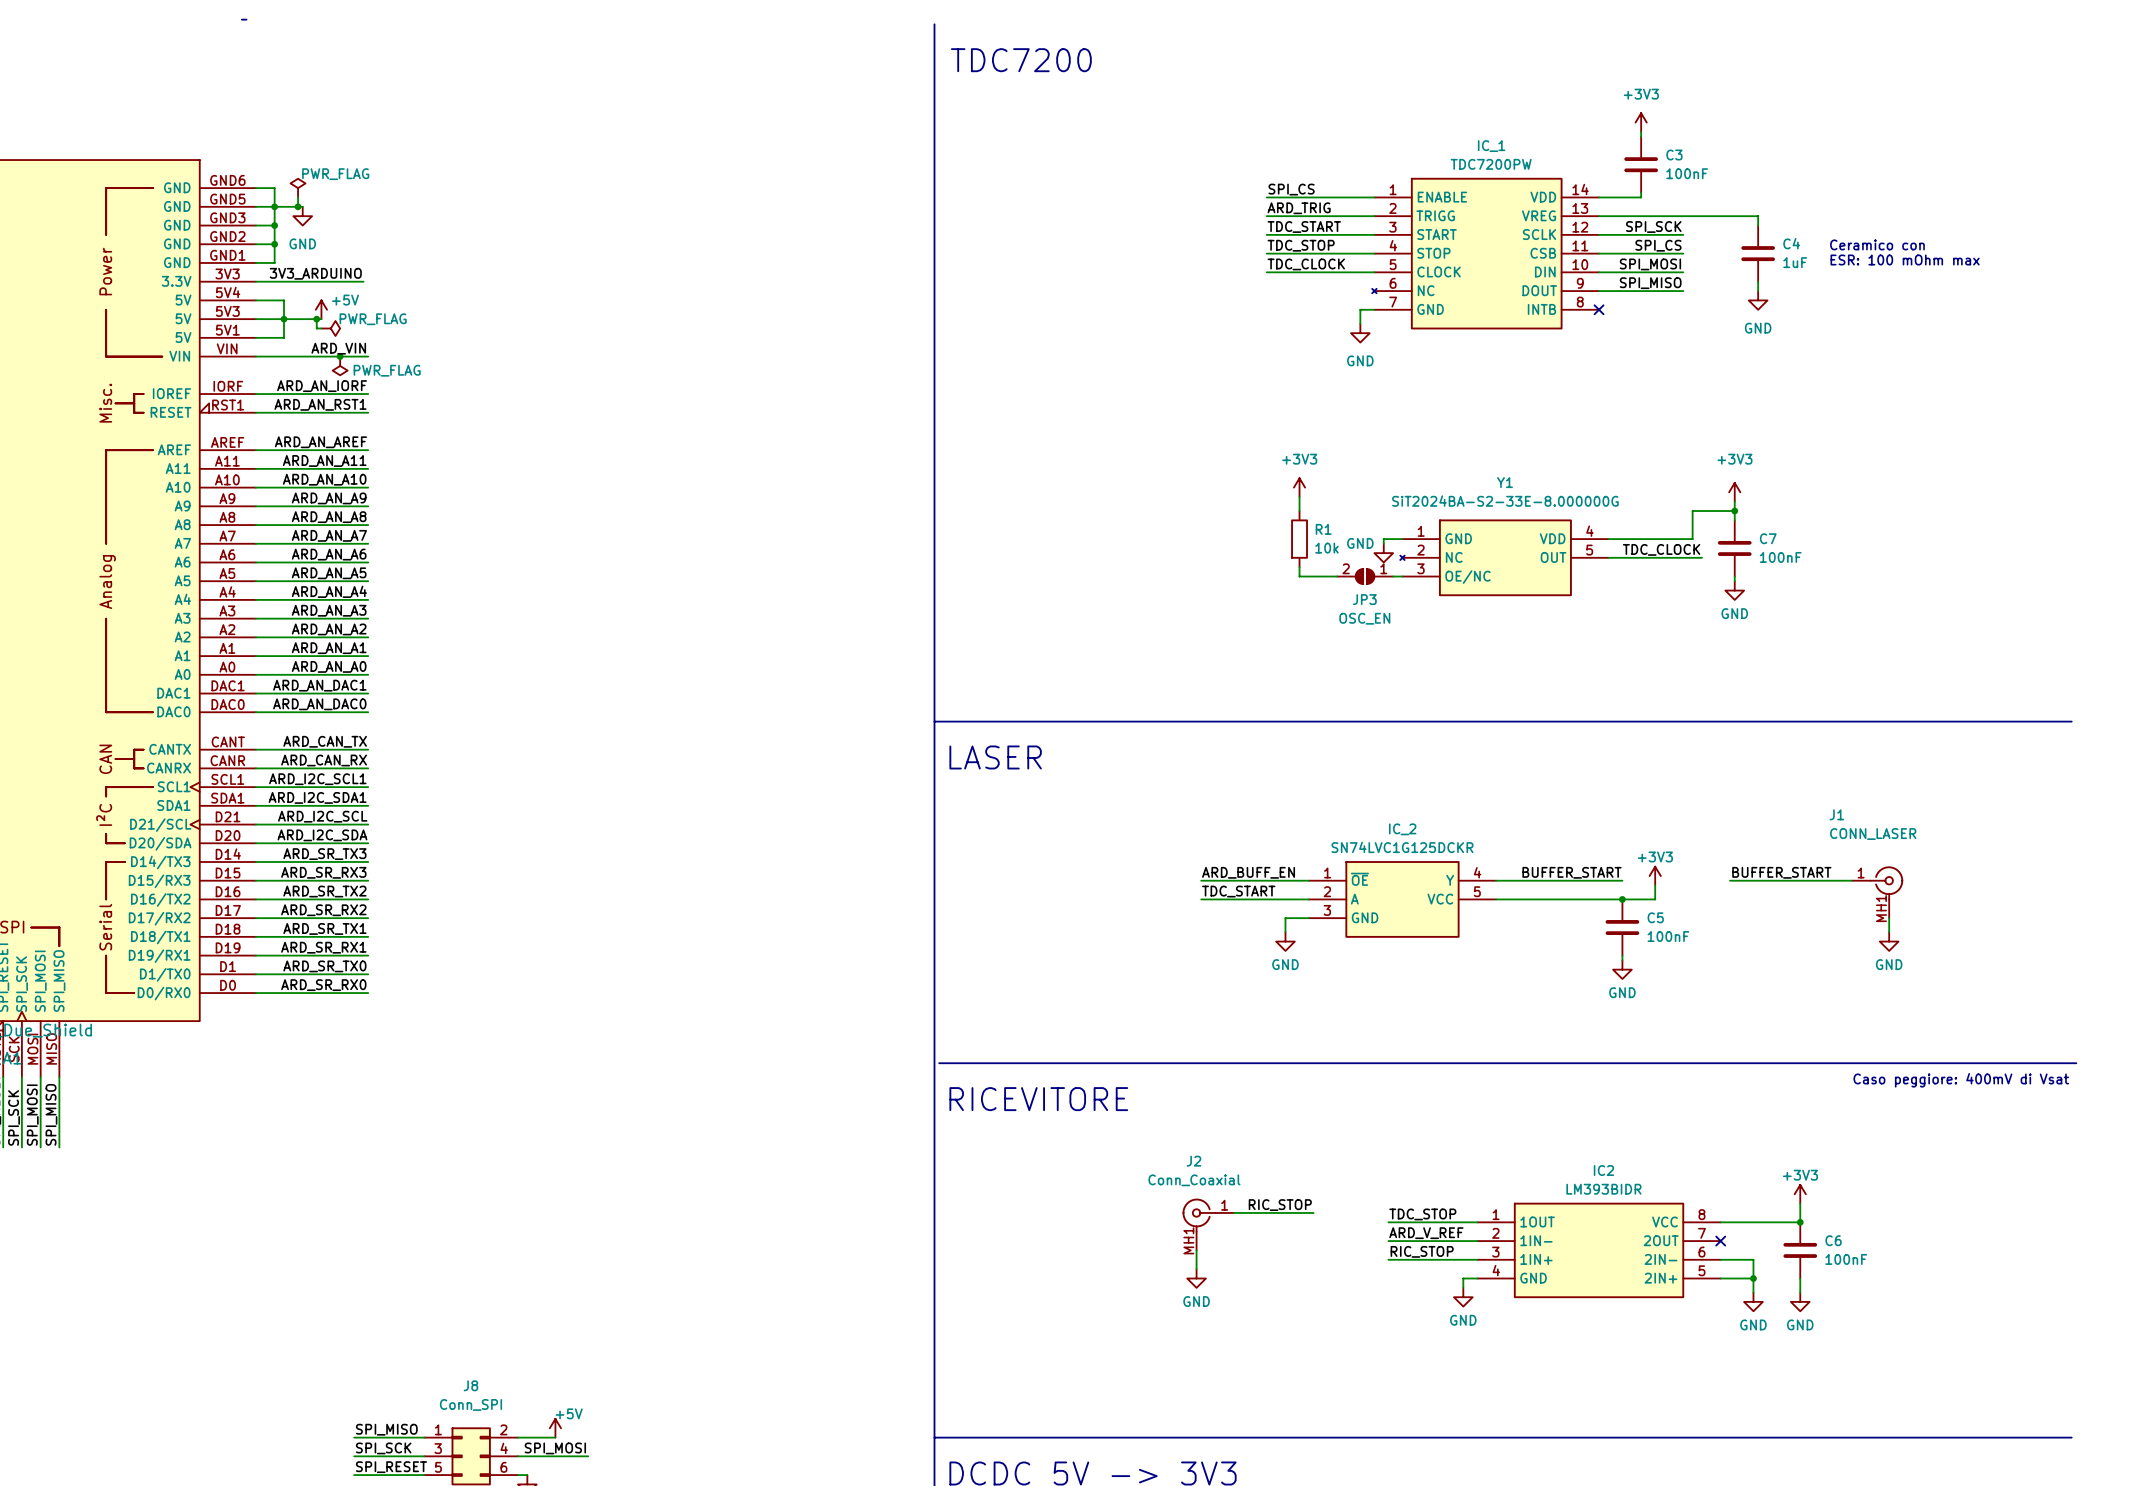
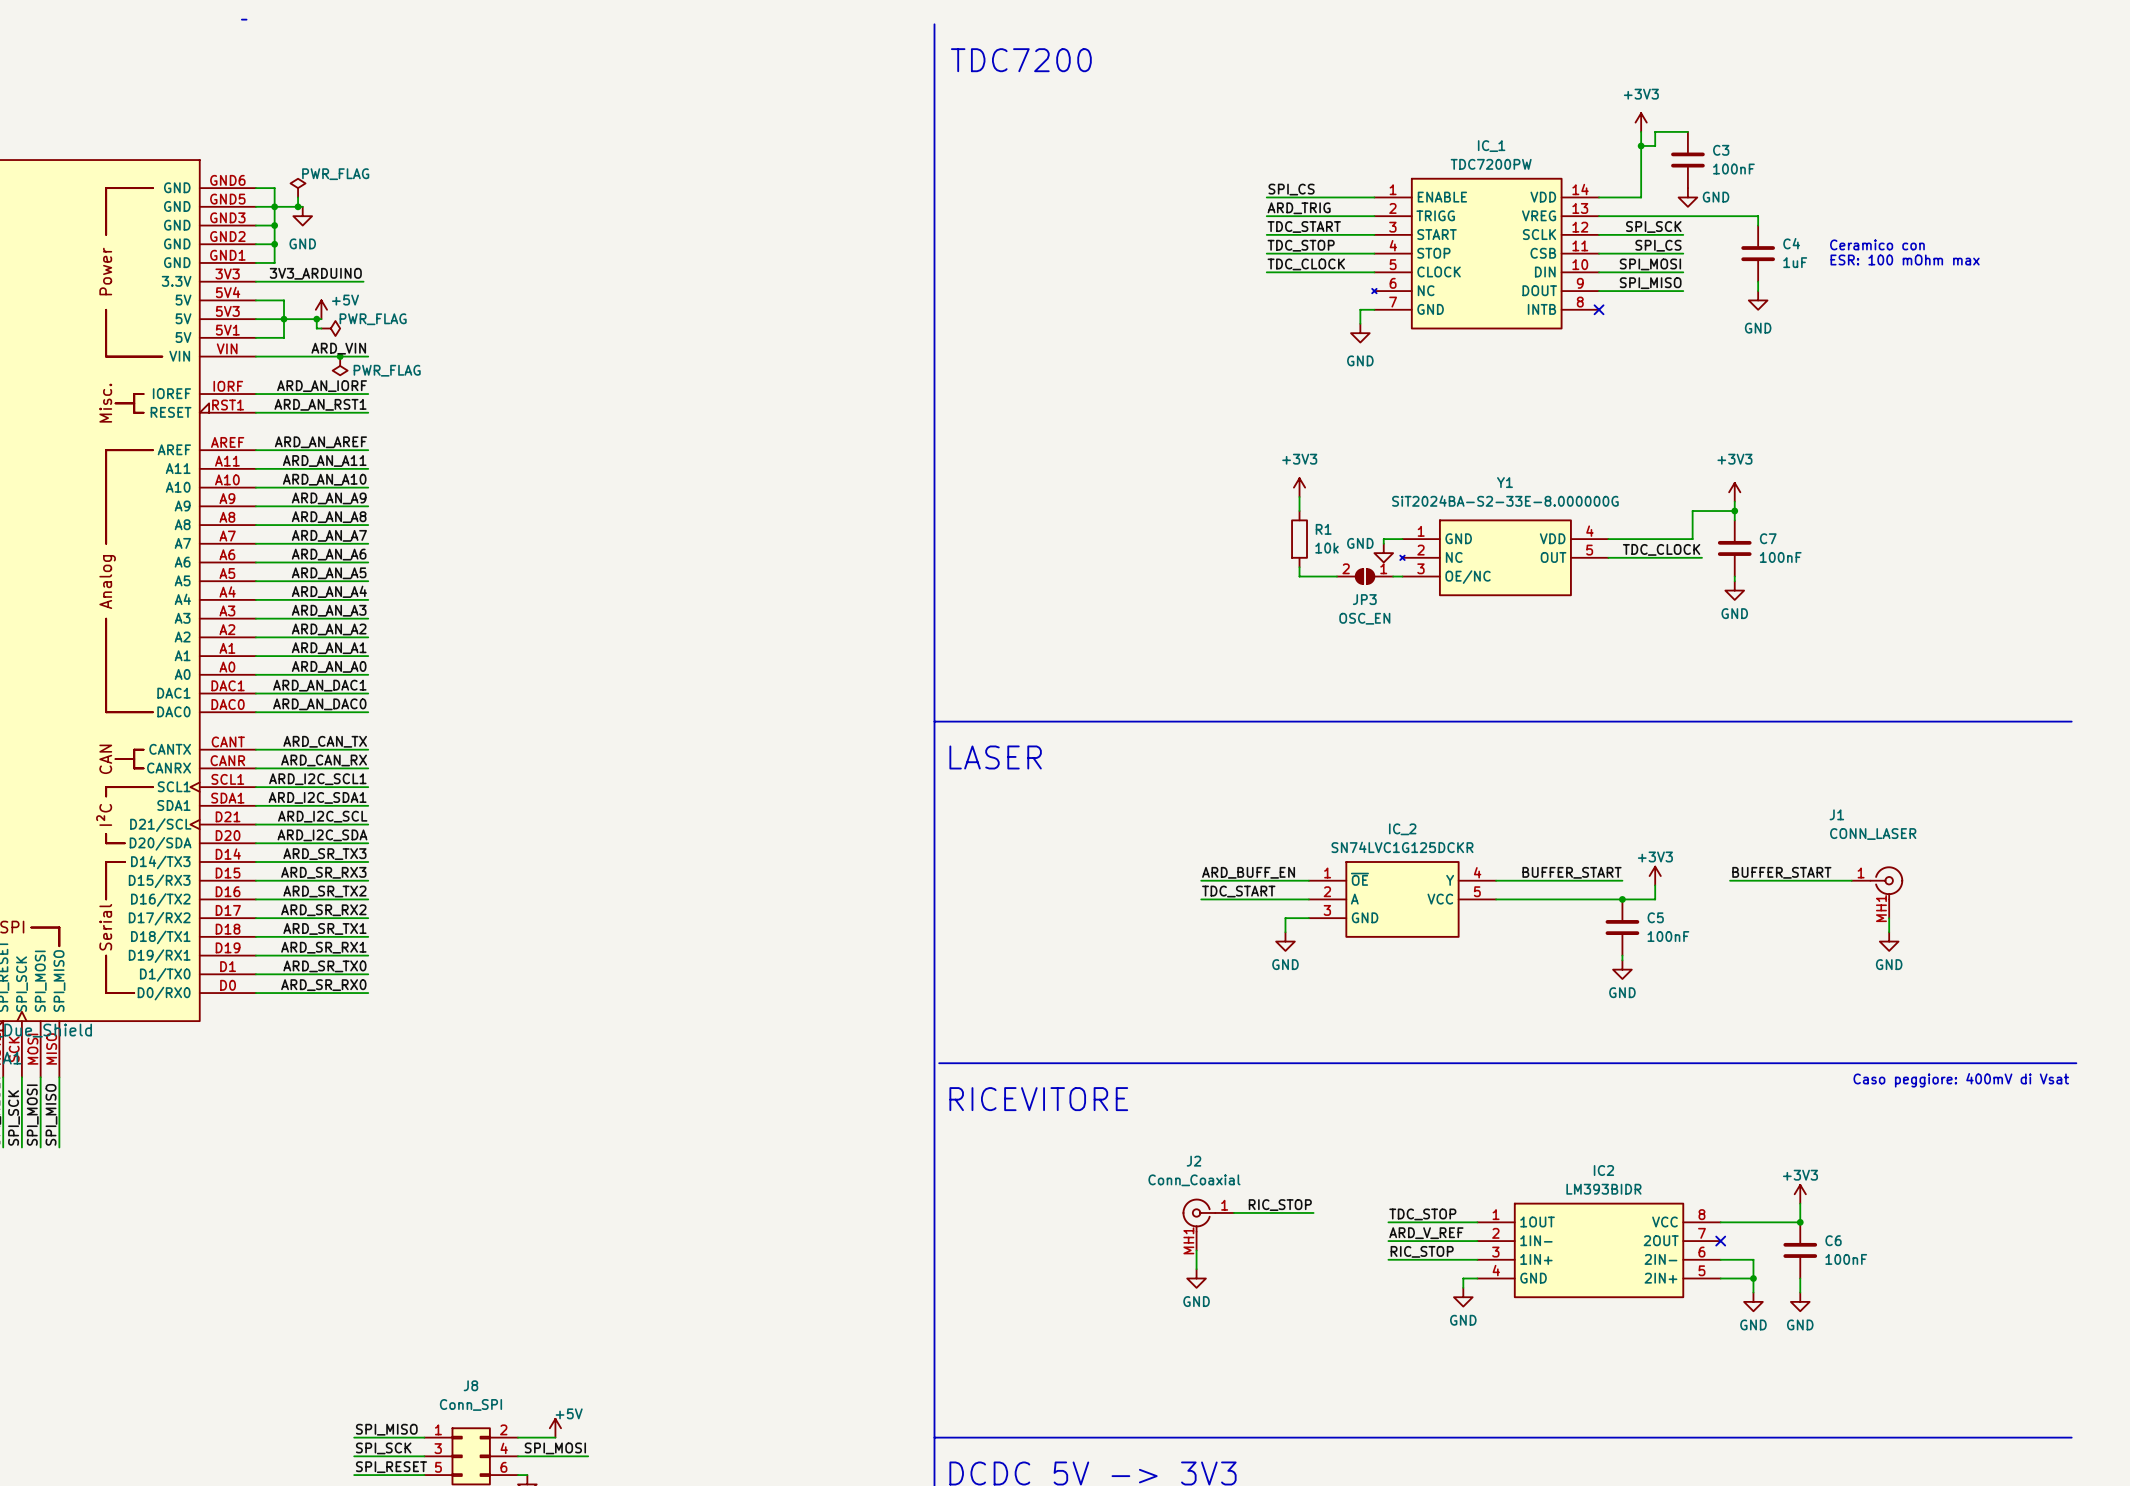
wire: none -> (1687, 131) (1655, 131) (1655, 145) (1641, 145)
junction: none -> (1641, 145)
C3 position: (1641, 164) -> (1687, 160)
power symbol: none -> GND (1687, 197)

